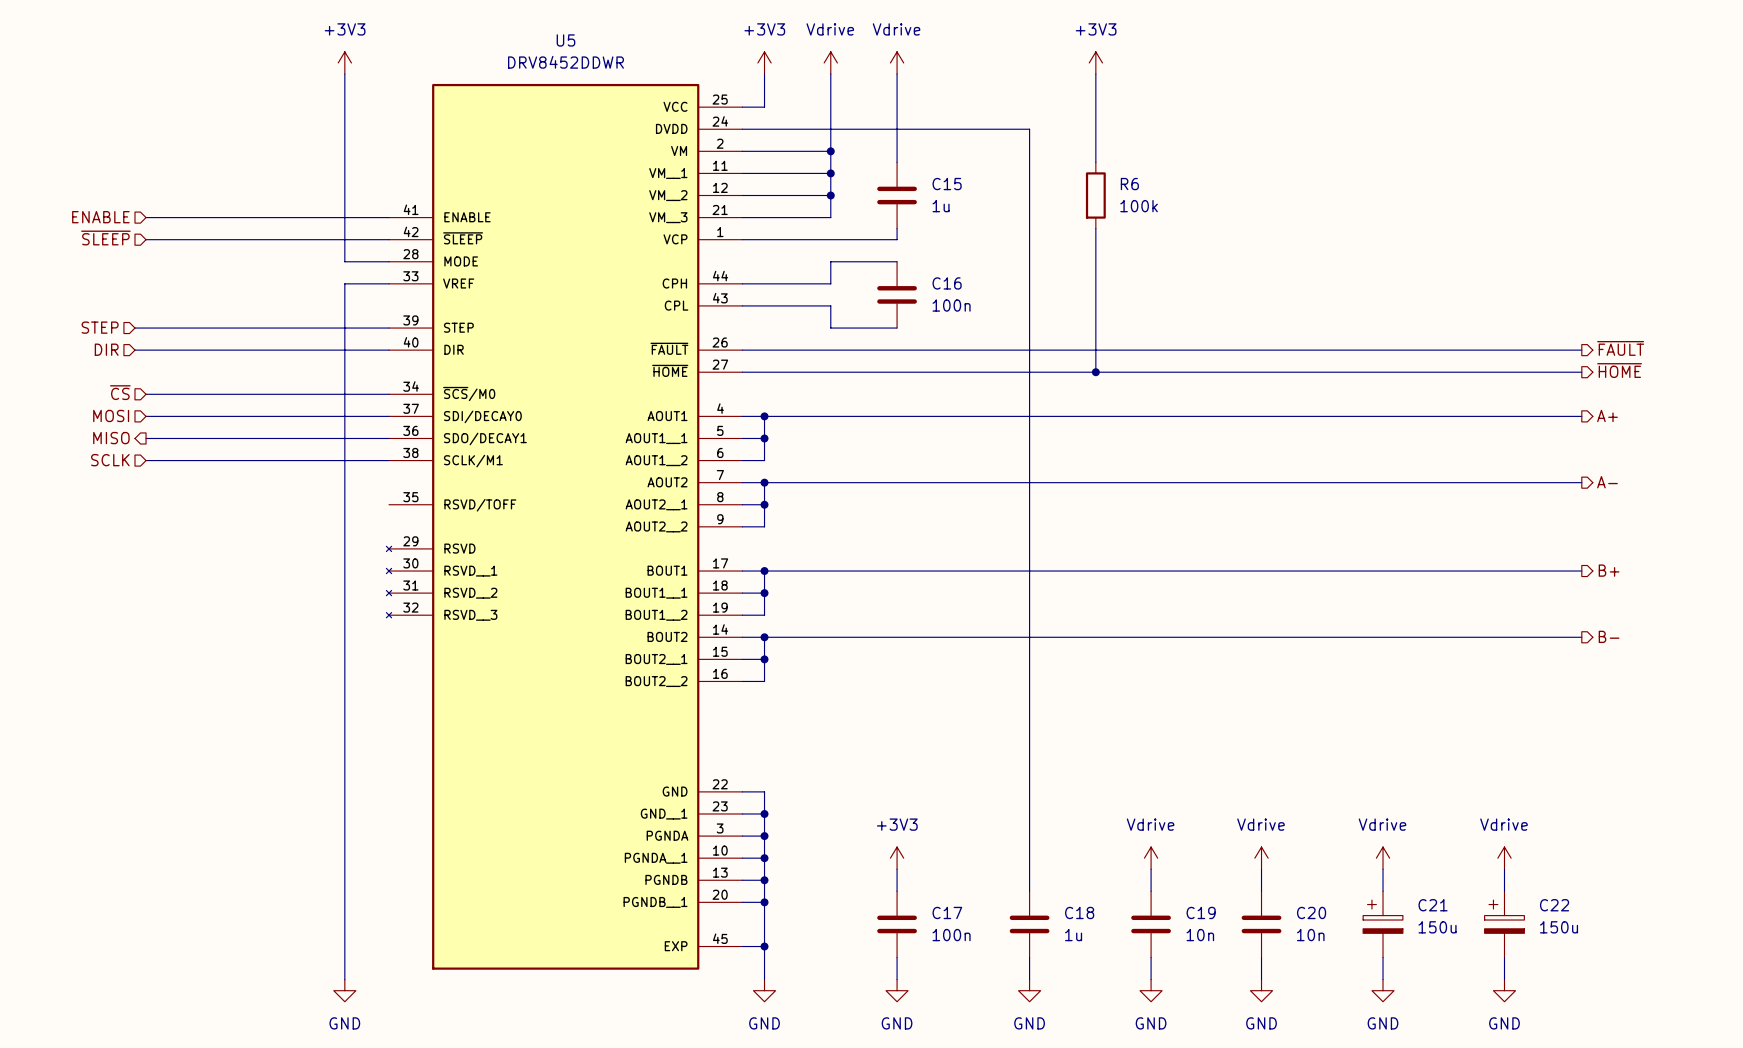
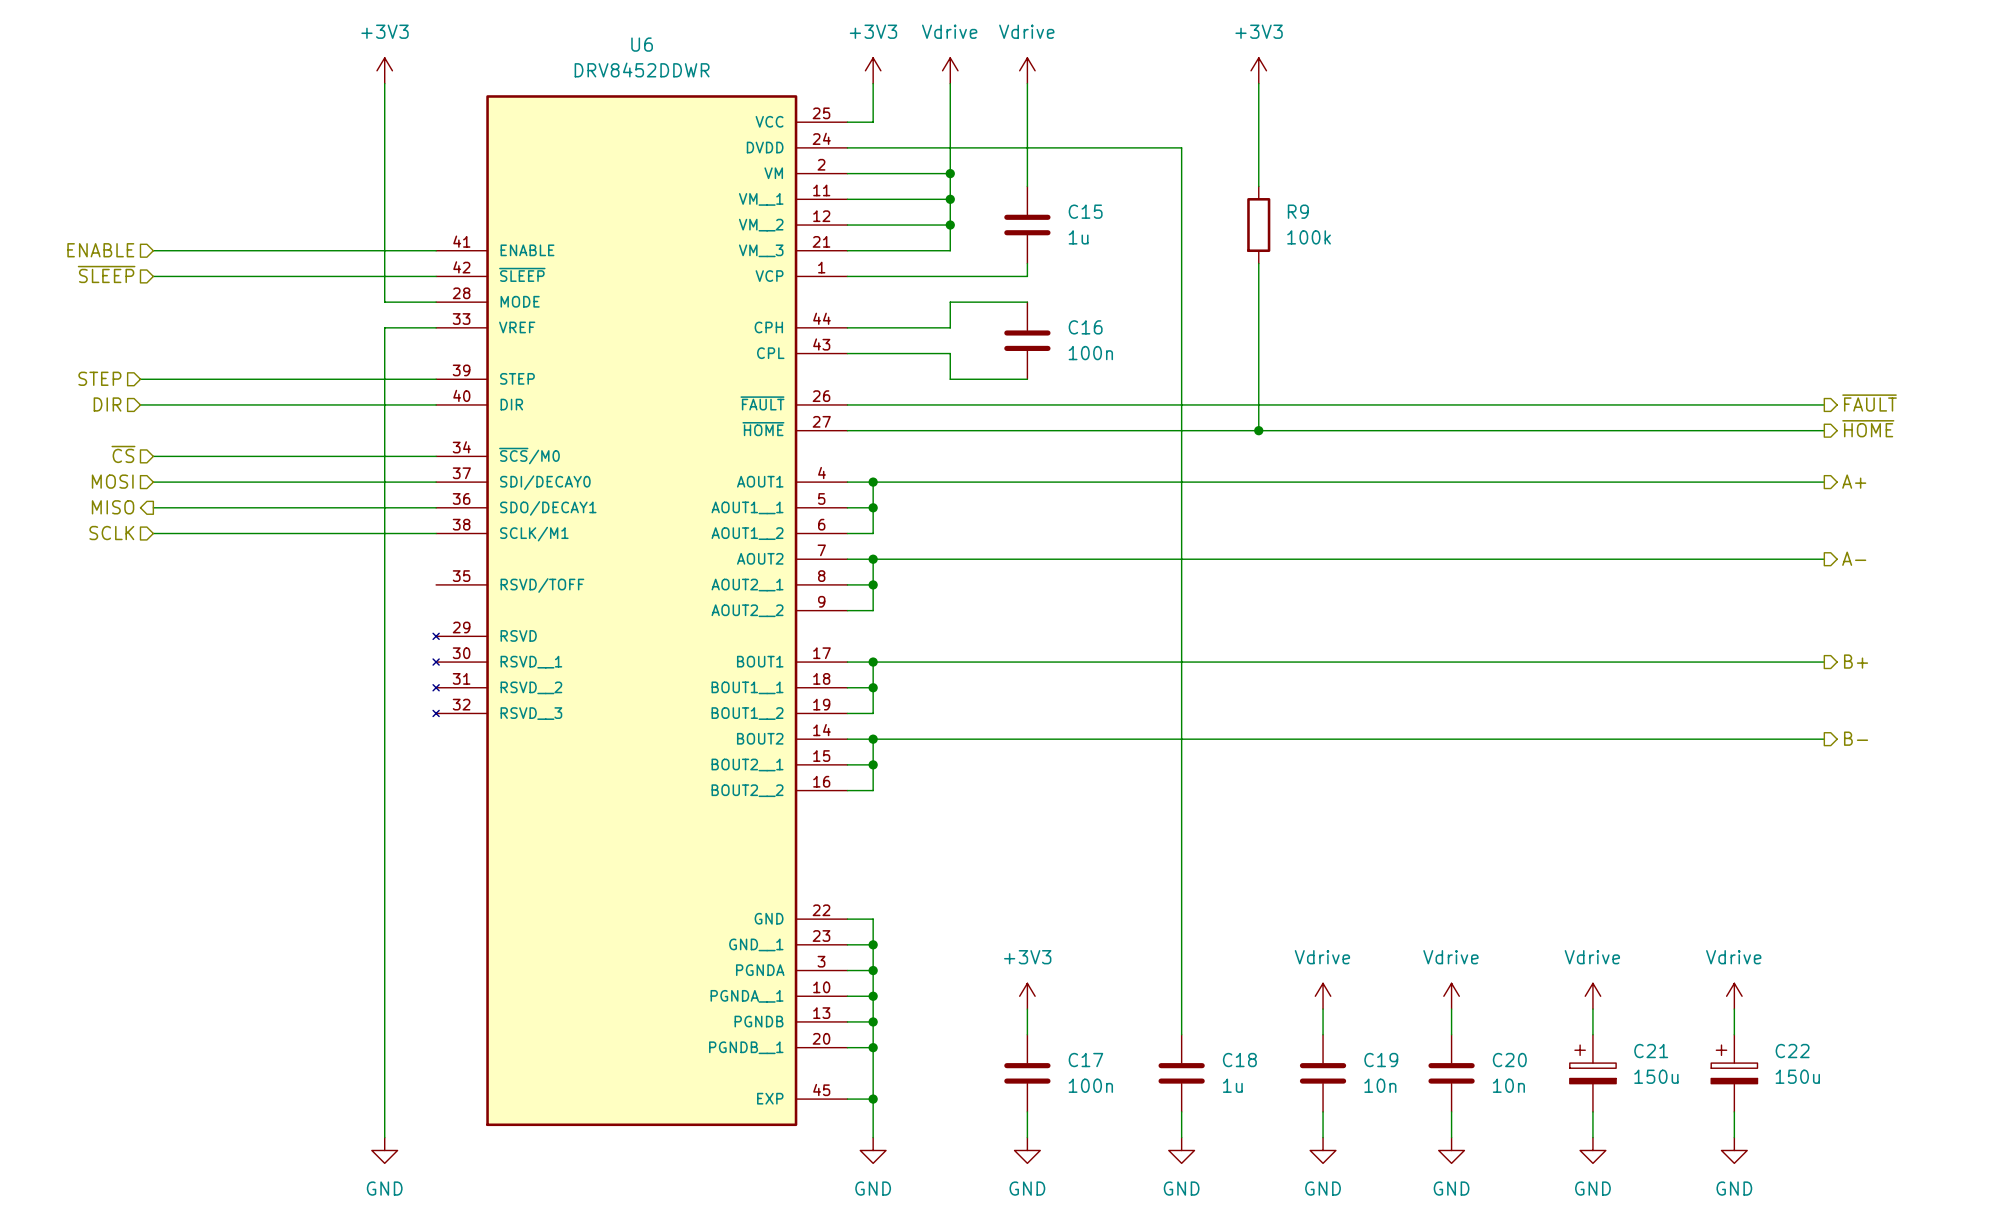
U5 name: U5 (565, 40) -> U6 (642, 44)
R6 name: R6 (1129, 184) -> R9 (1298, 211)

